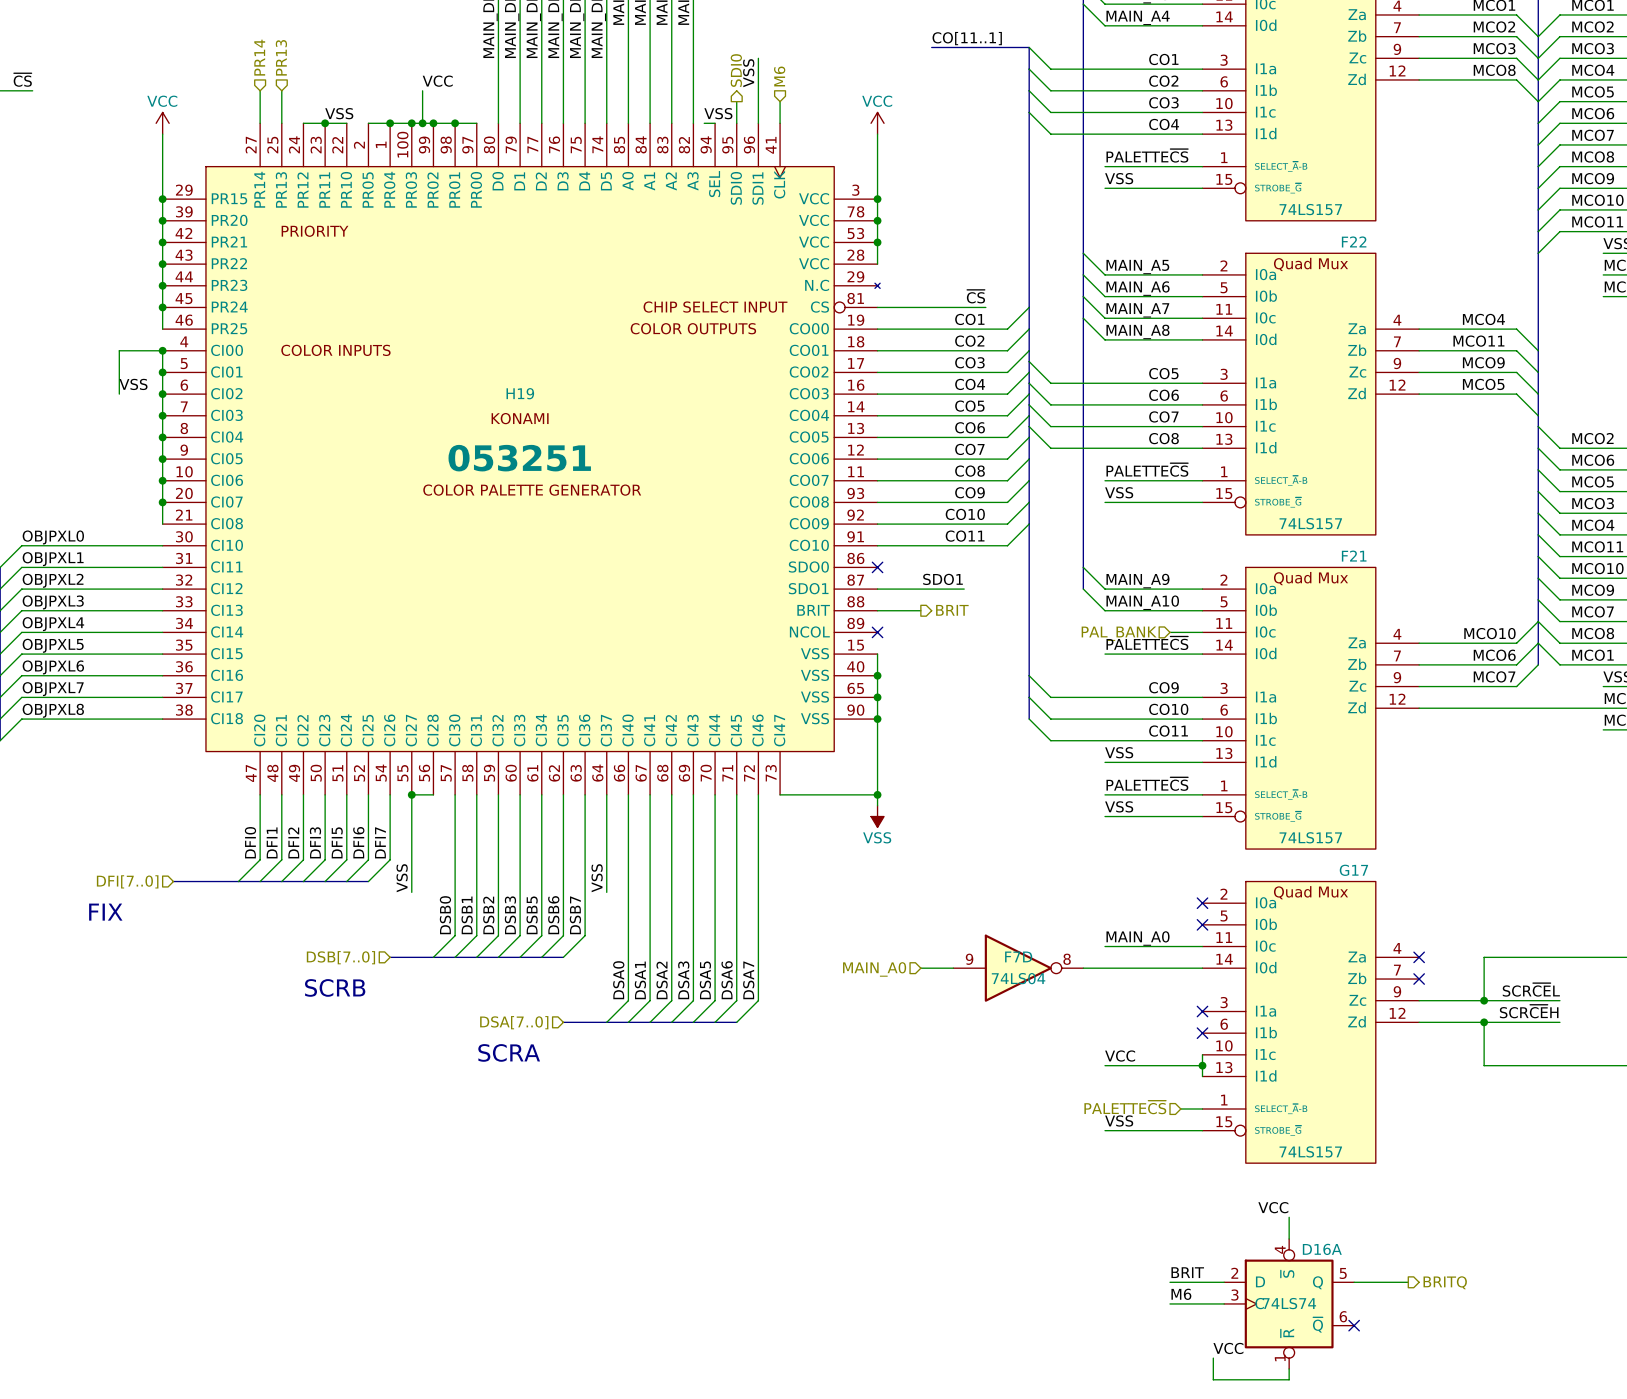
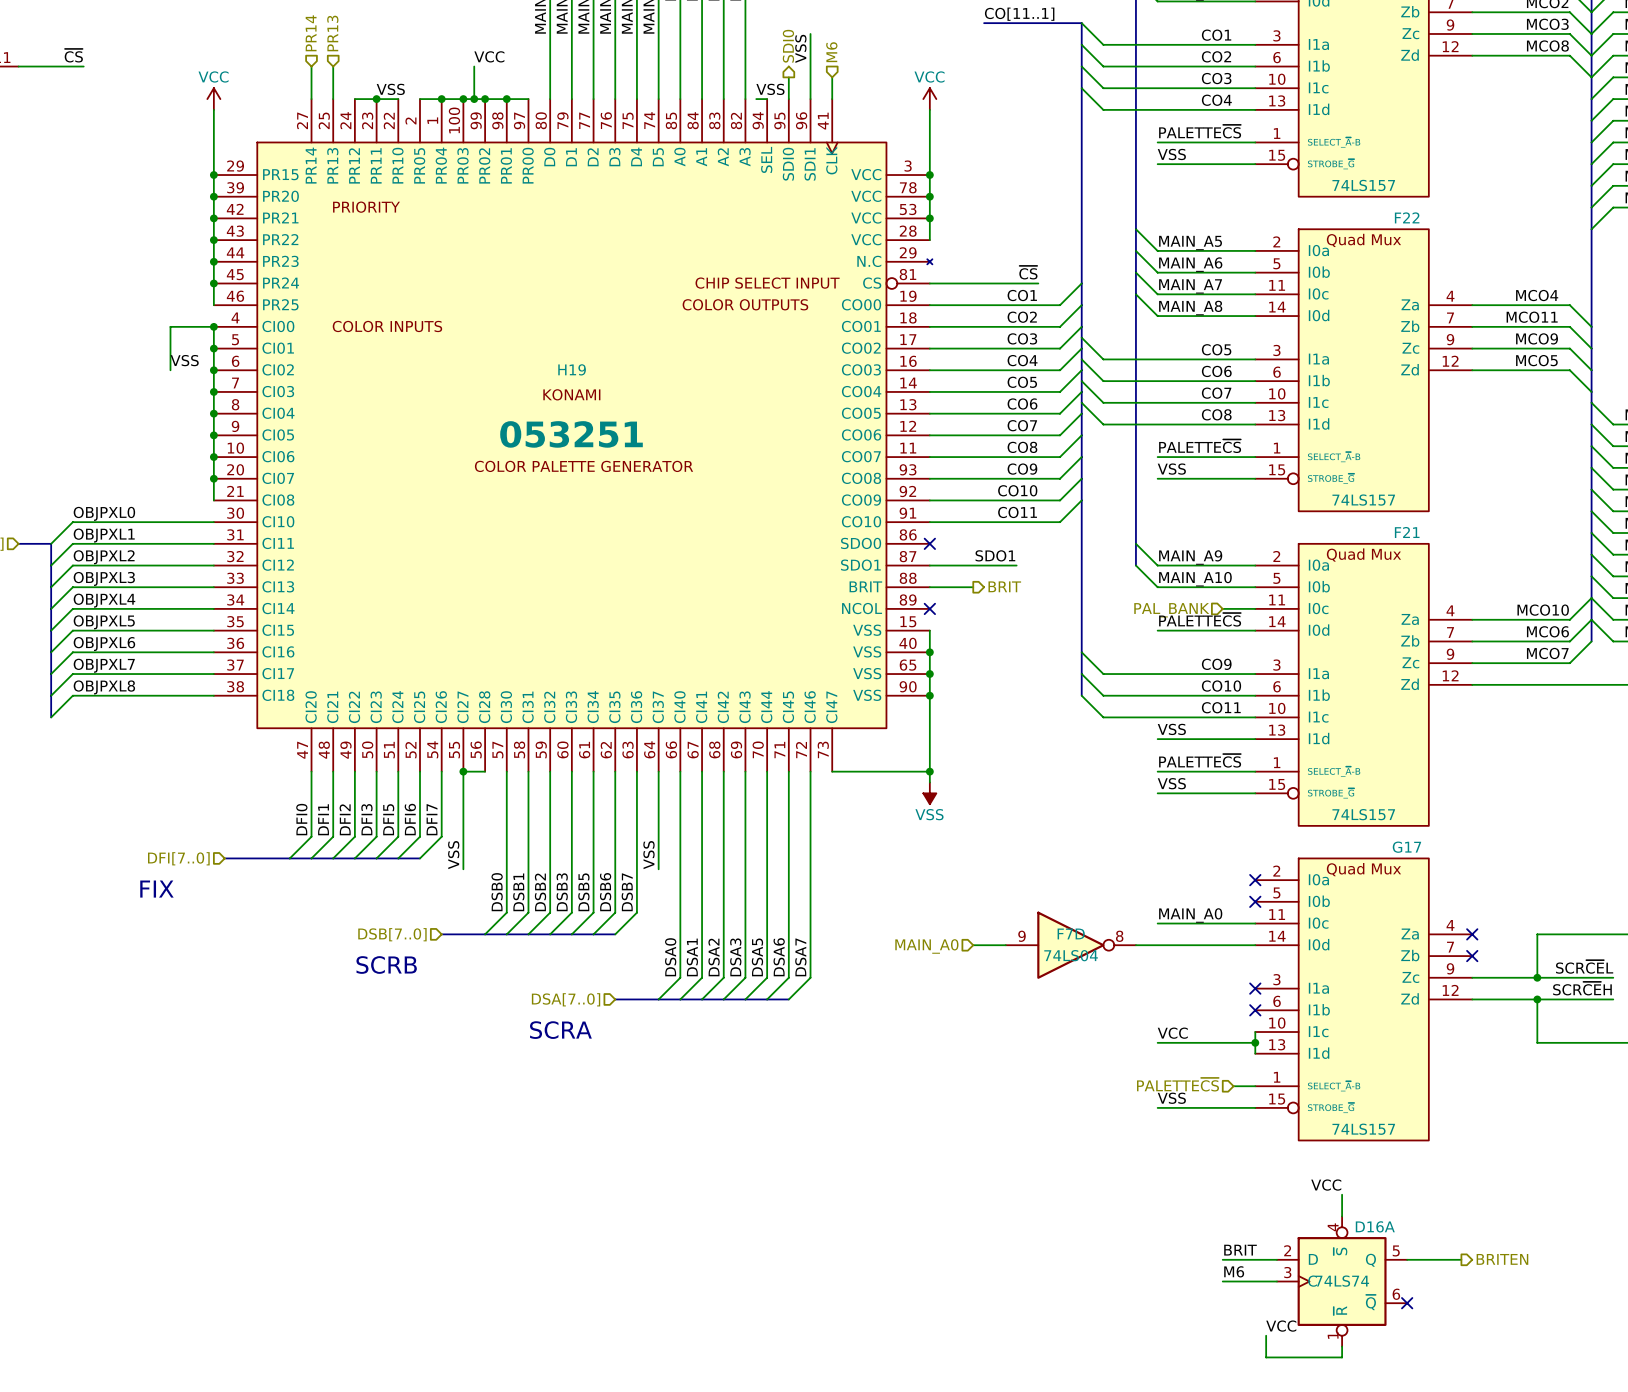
hierarchical label: BRITQ (1445, 1282) -> BRITEN (1502, 1259)

